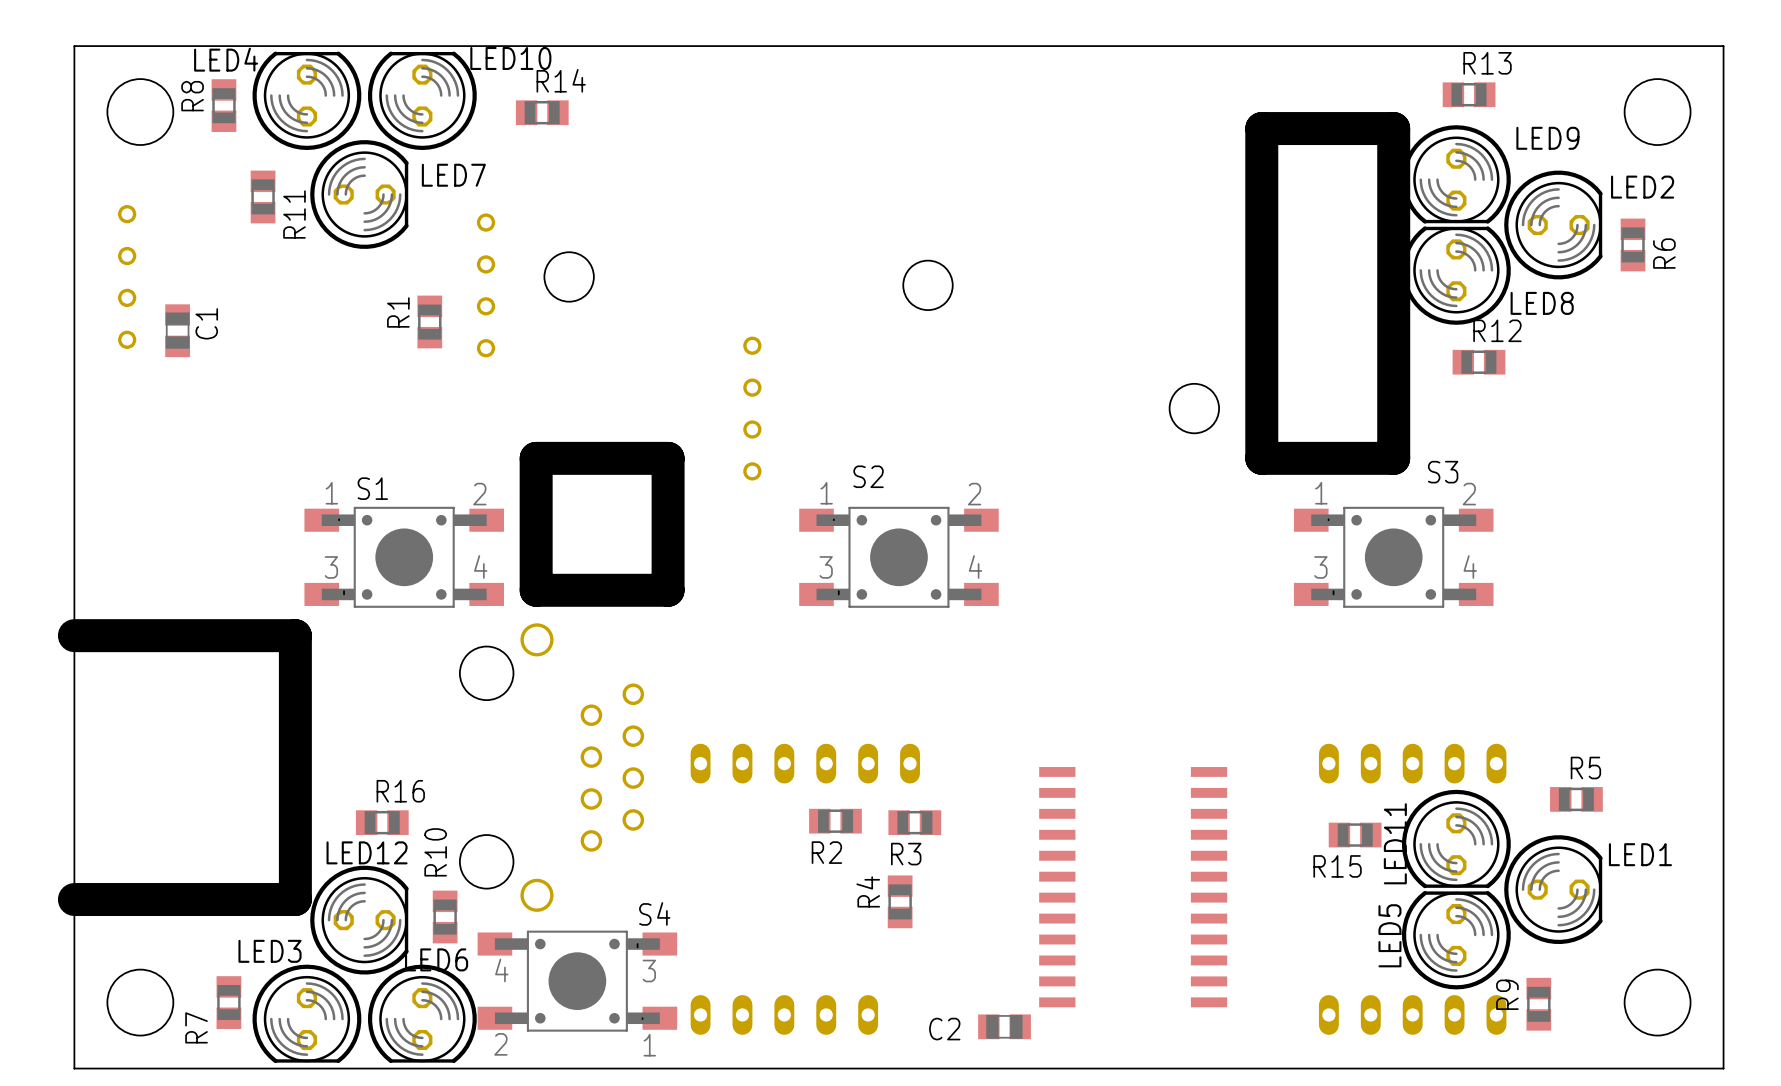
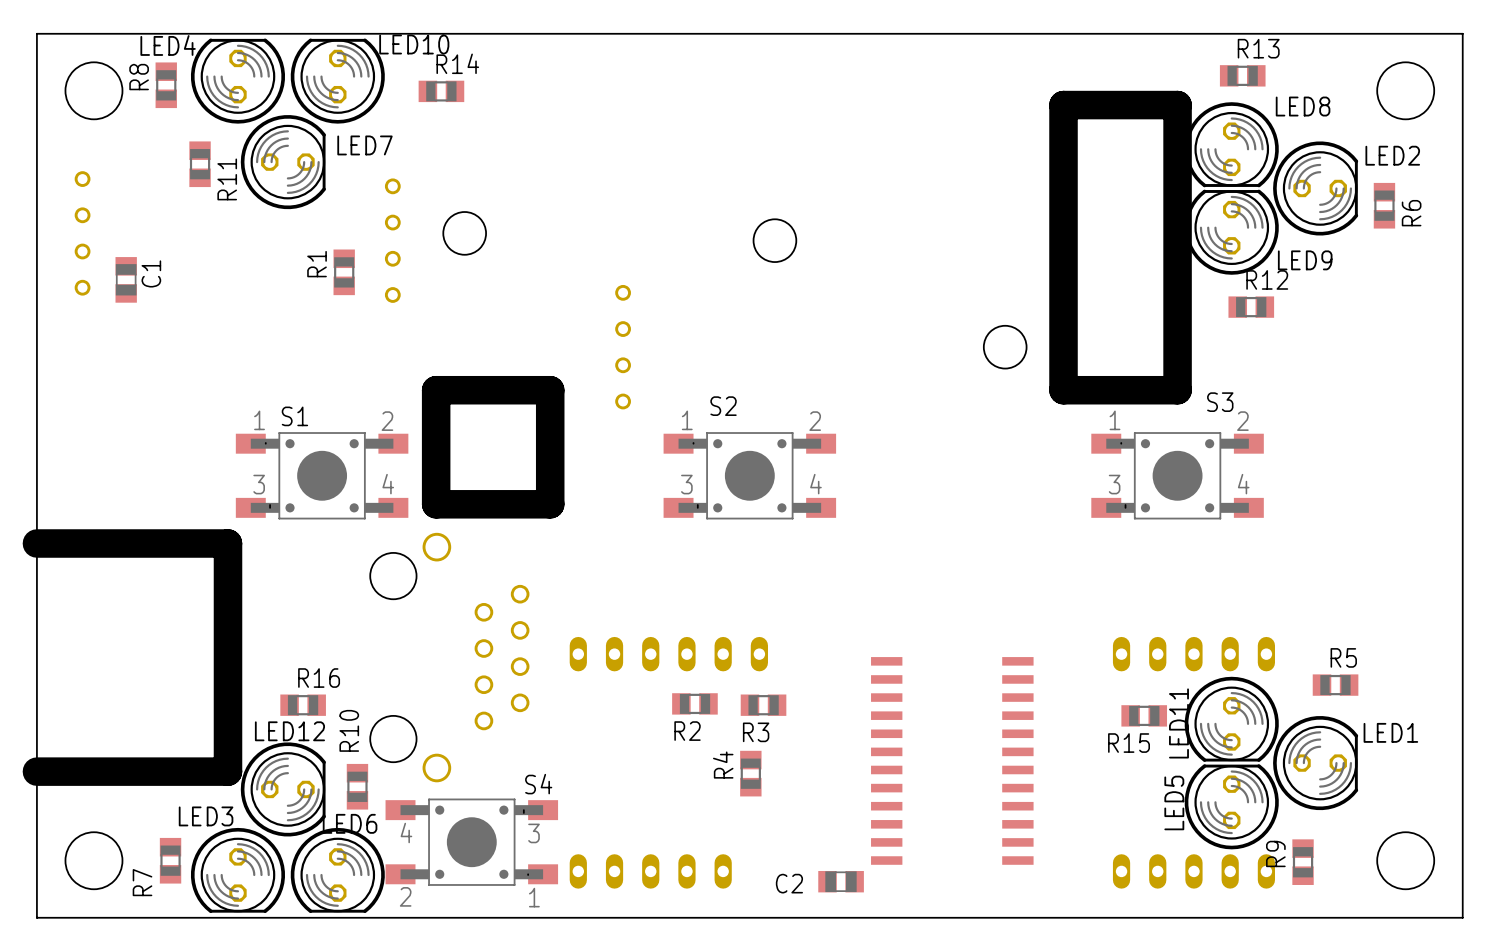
LED9 name position: LED9 (1547, 138) -> LED9 (1305, 260)
LED8 name position: LED8 (1542, 303) -> LED8 (1303, 106)

